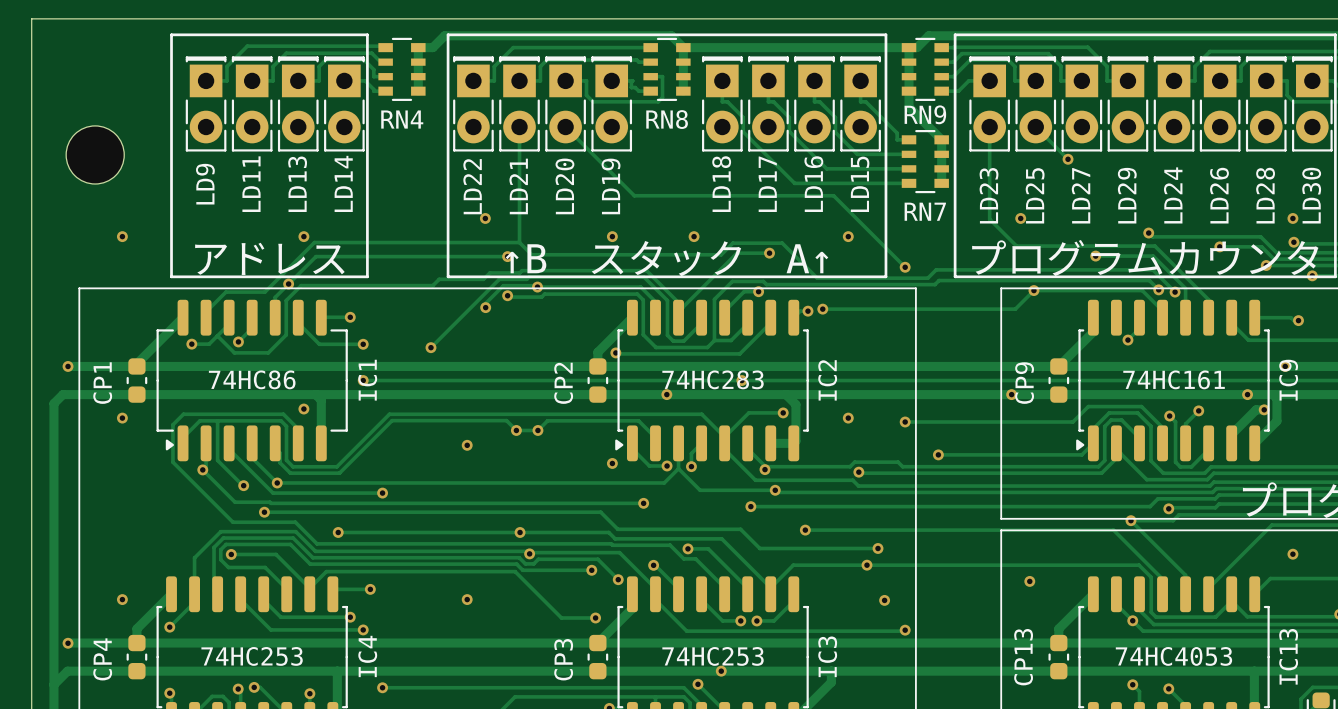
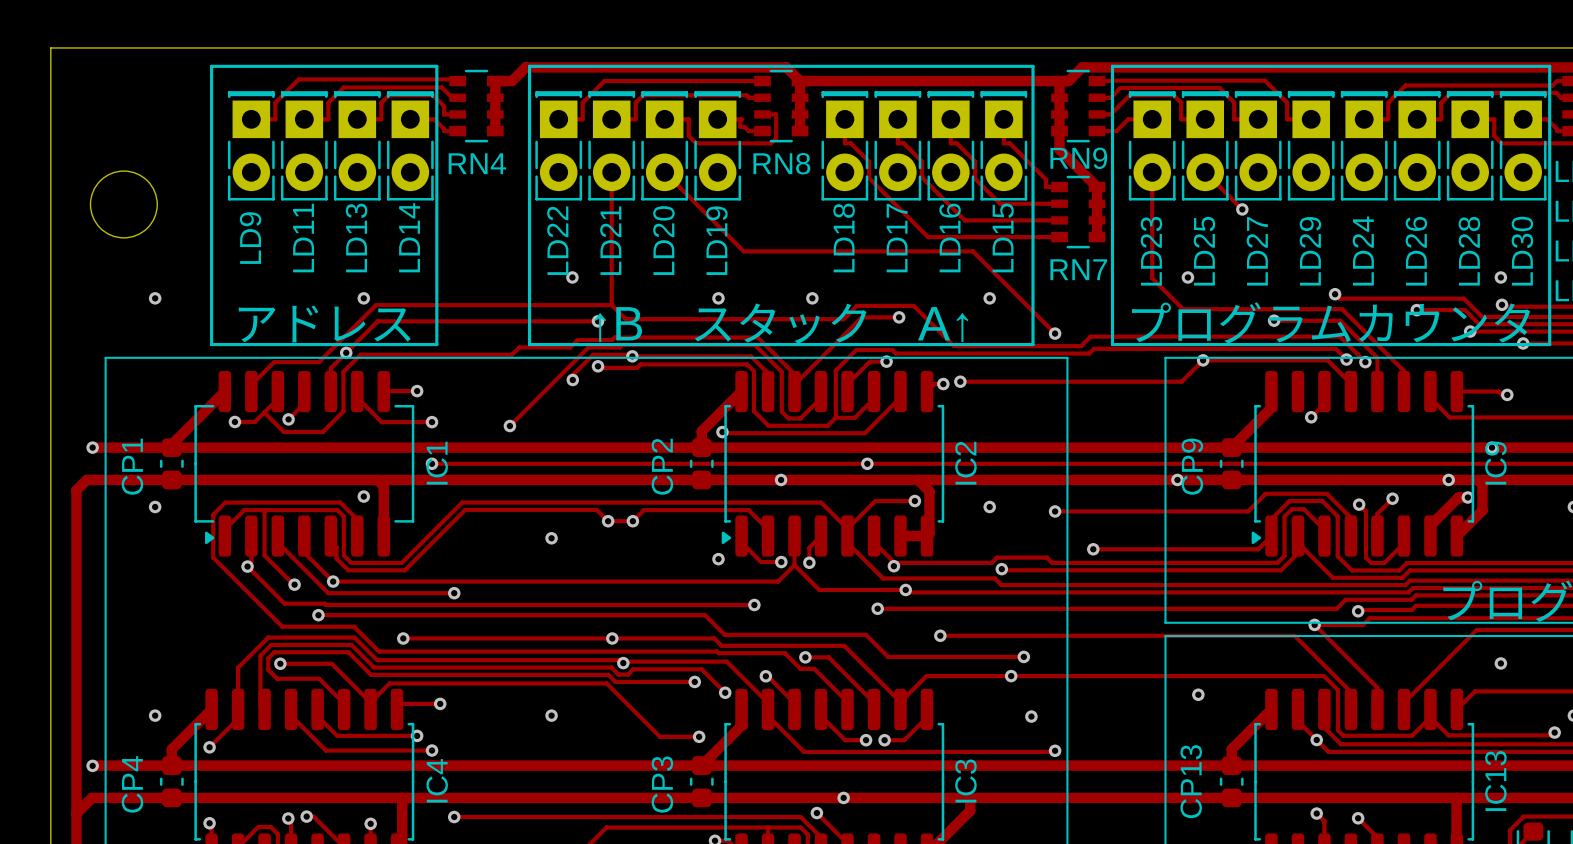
text: 74HC86 (252, 379) -> none
text: 74HC283 (713, 379) -> none
text: 74HC161 (1174, 379) -> none
text: 74HC253 (252, 656) -> none
text: 74HC253 (713, 656) -> none
text: 74HC4053 (1173, 656) -> none

